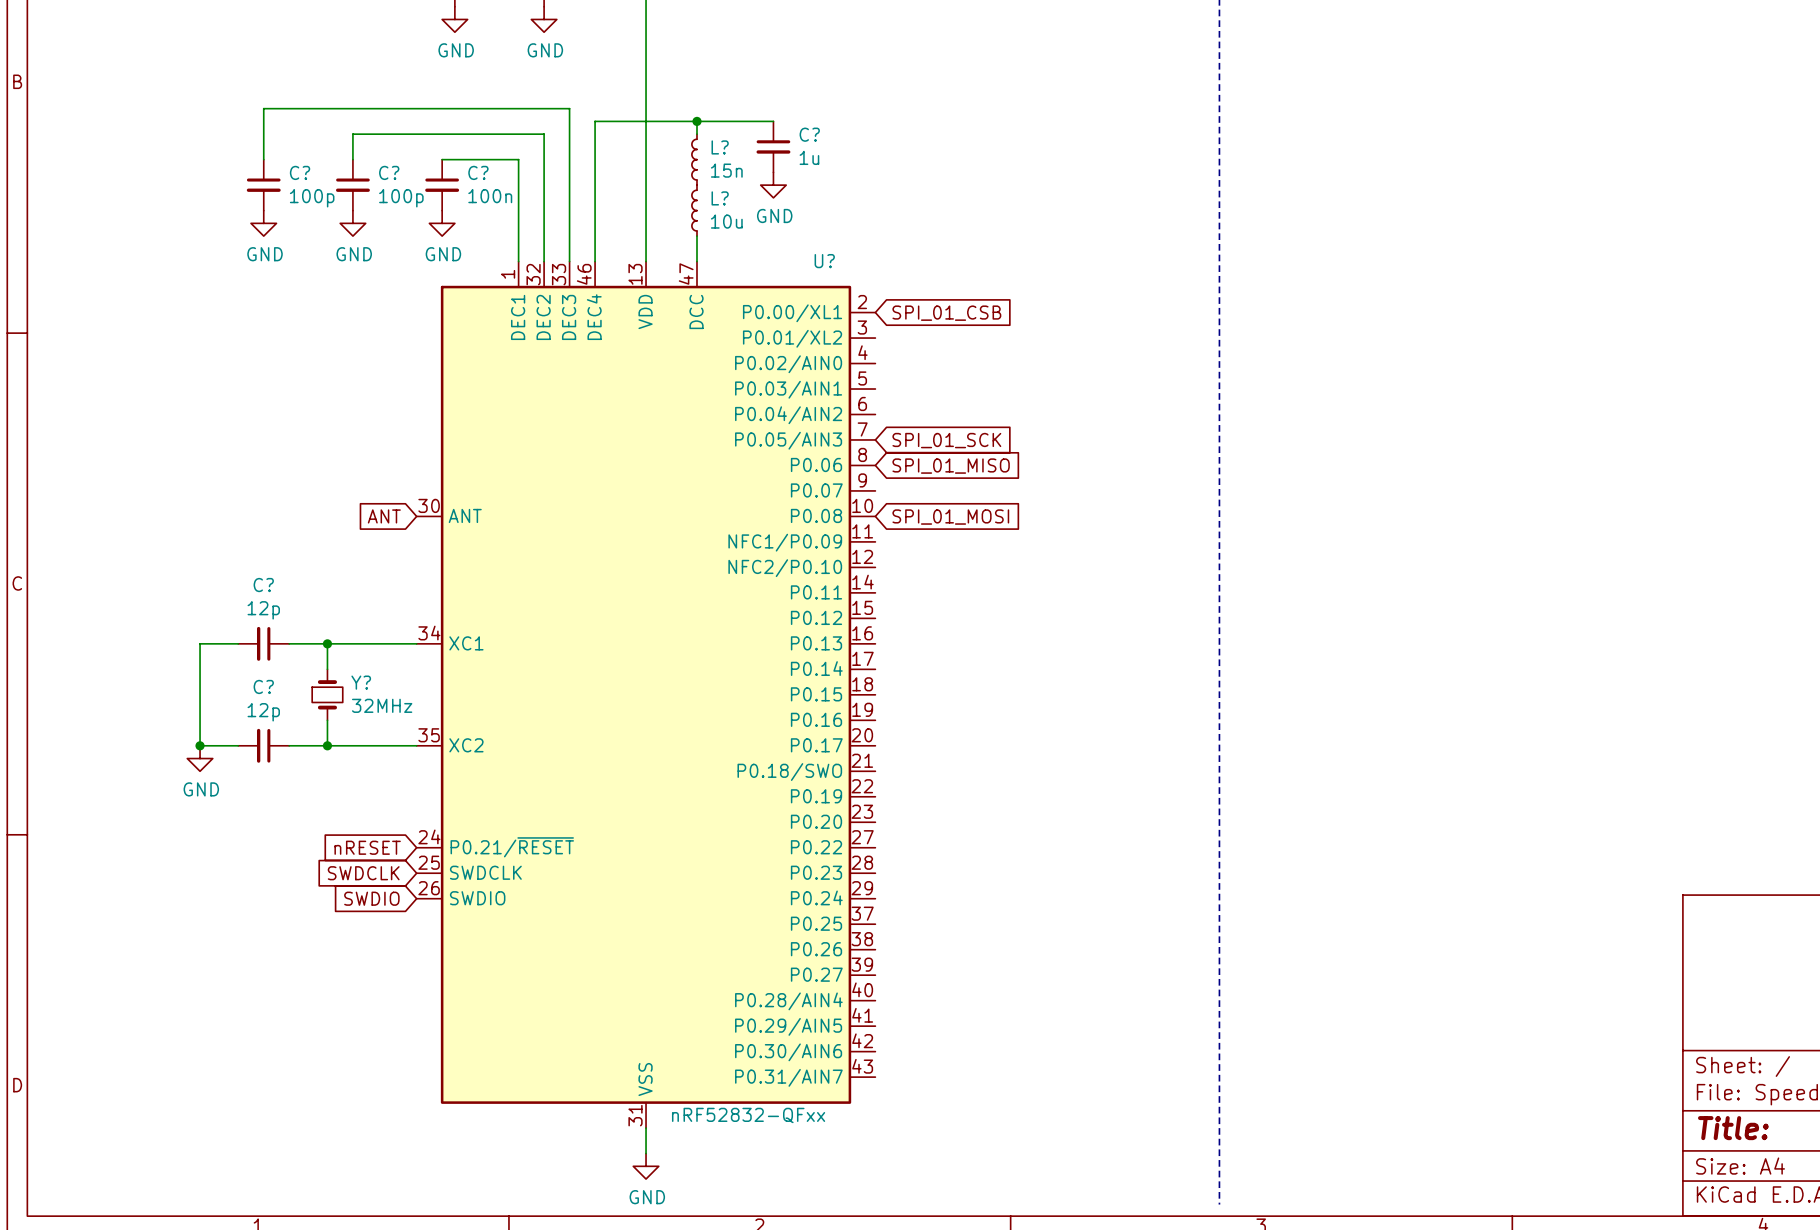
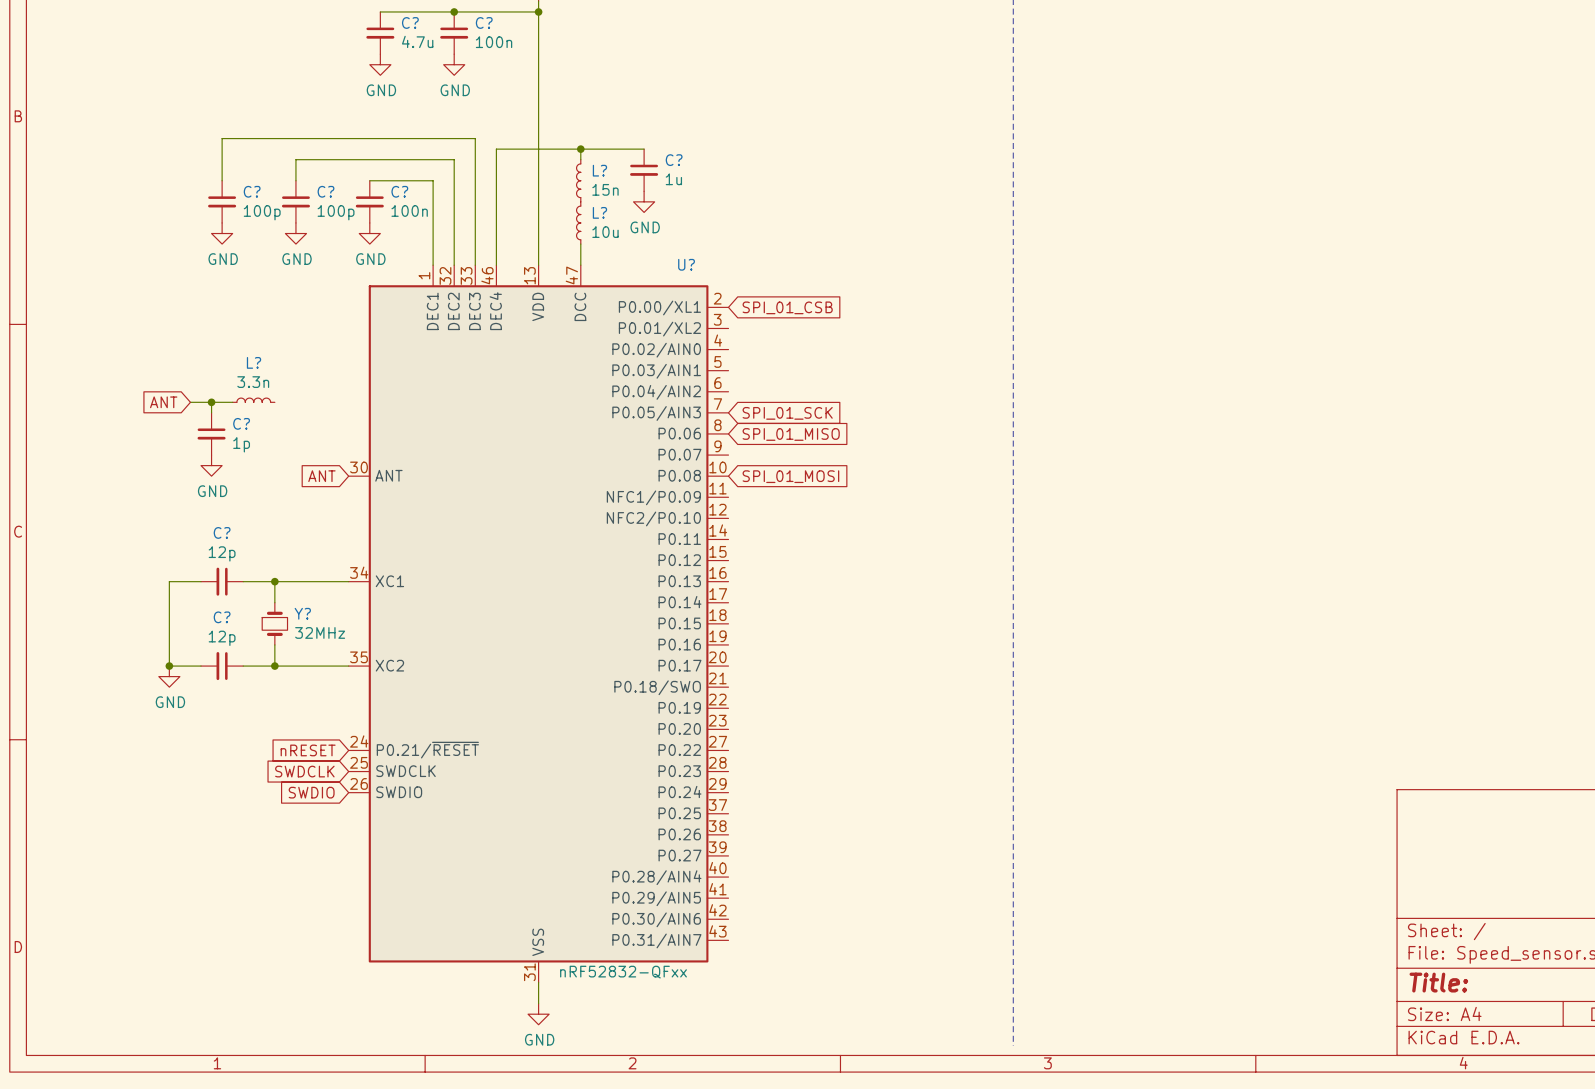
L?: none -> 3.3n (253, 400)
global label: none -> ANT (163, 402)
wire: none -> (190, 402) (232, 402)
wire: none -> (211, 402) (211, 412)
junction: none -> (211, 402)
C?: none -> 1p (211, 433)
power symbol: none -> GND (211, 465)

